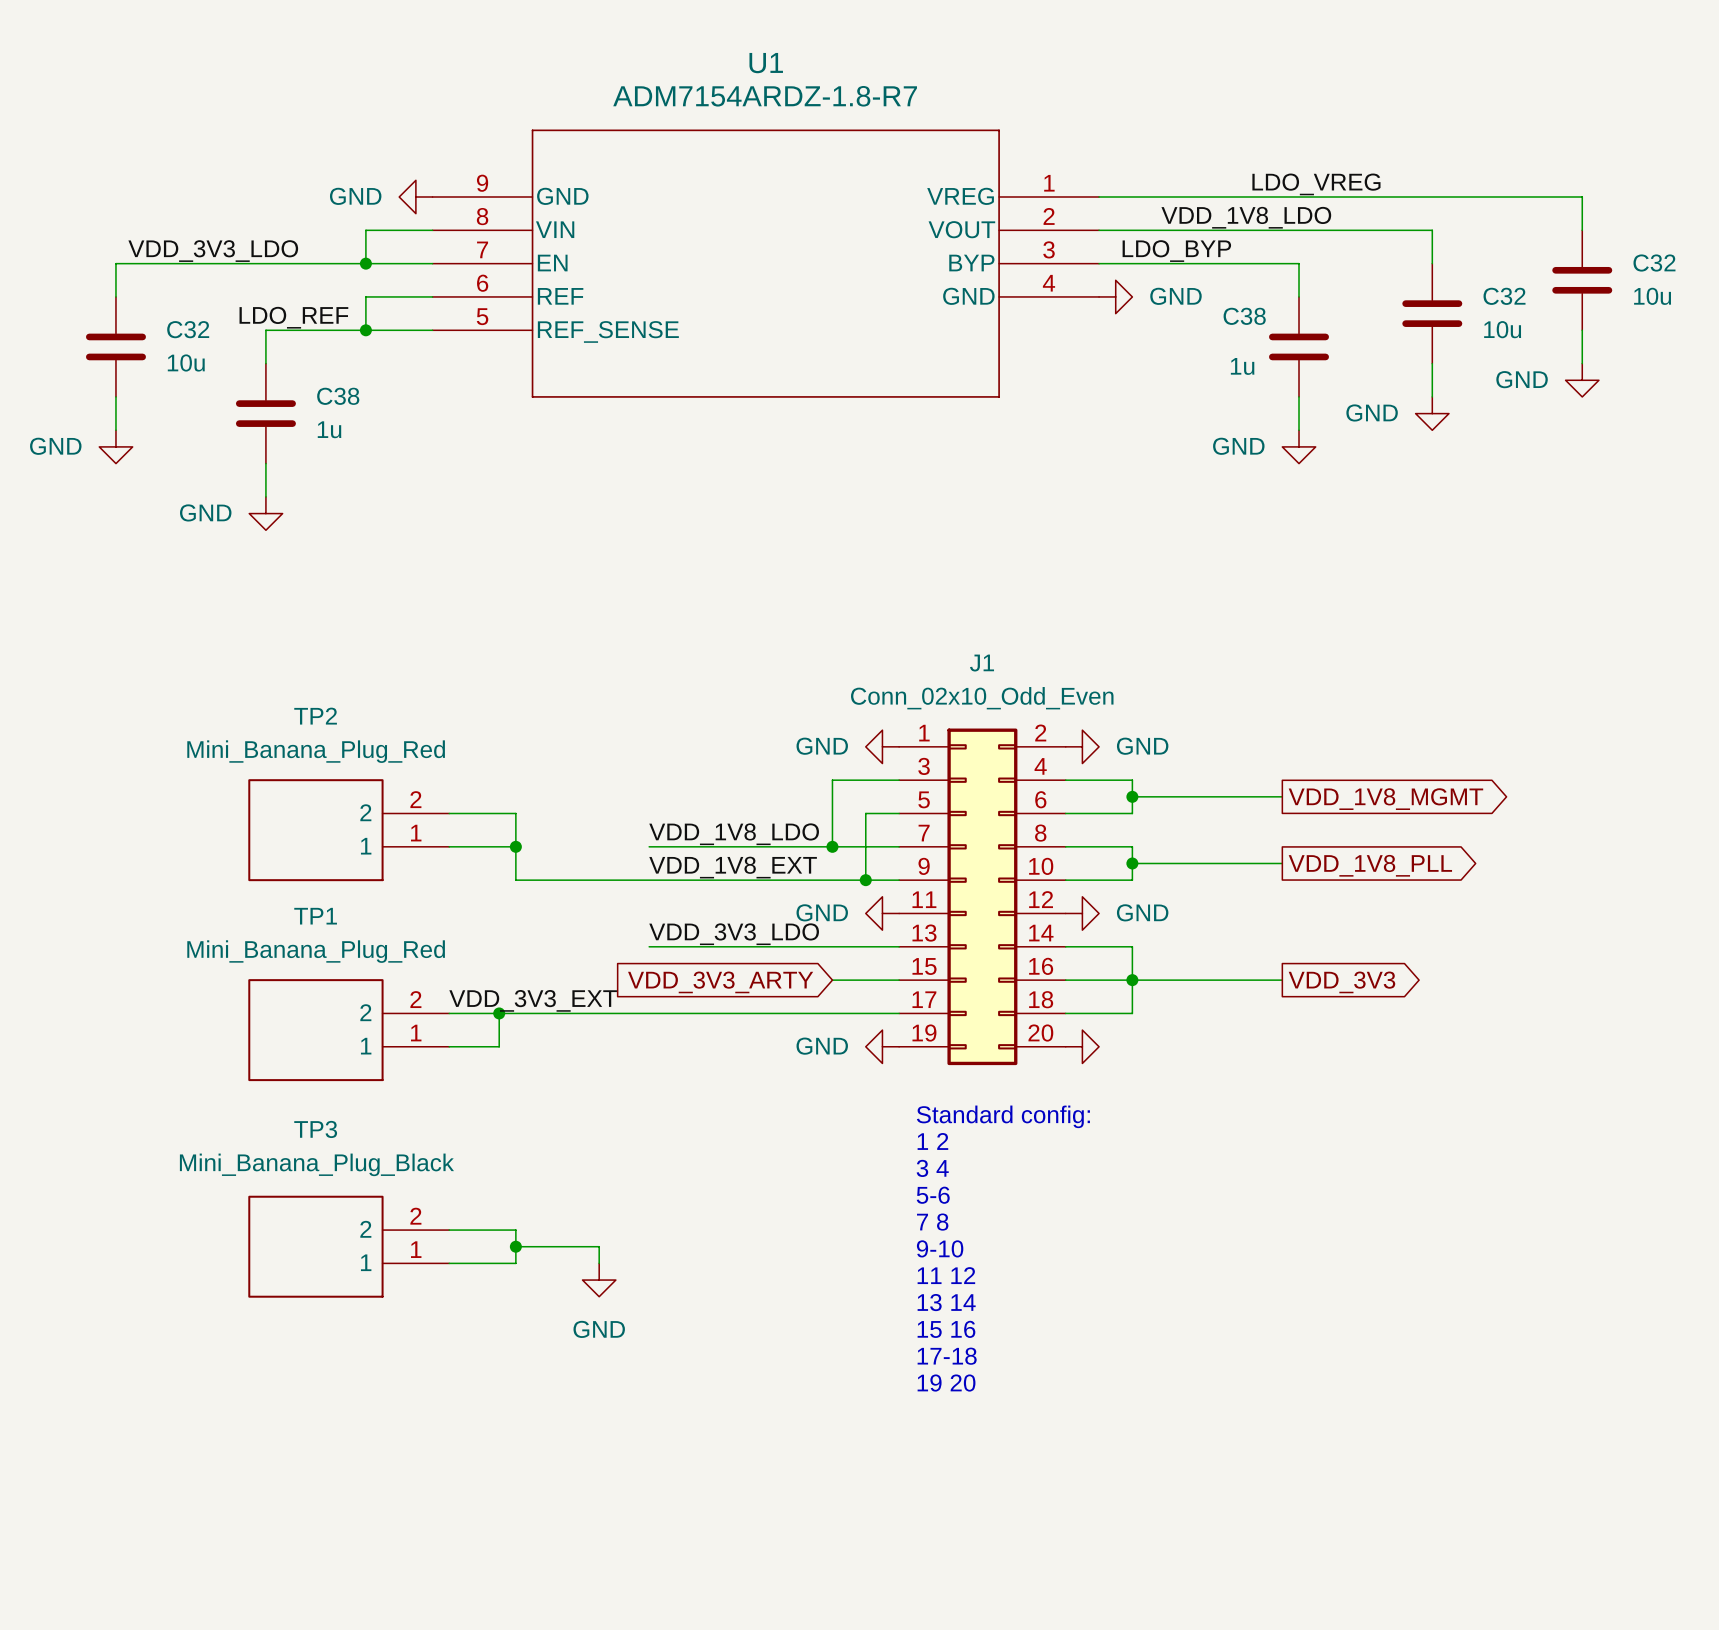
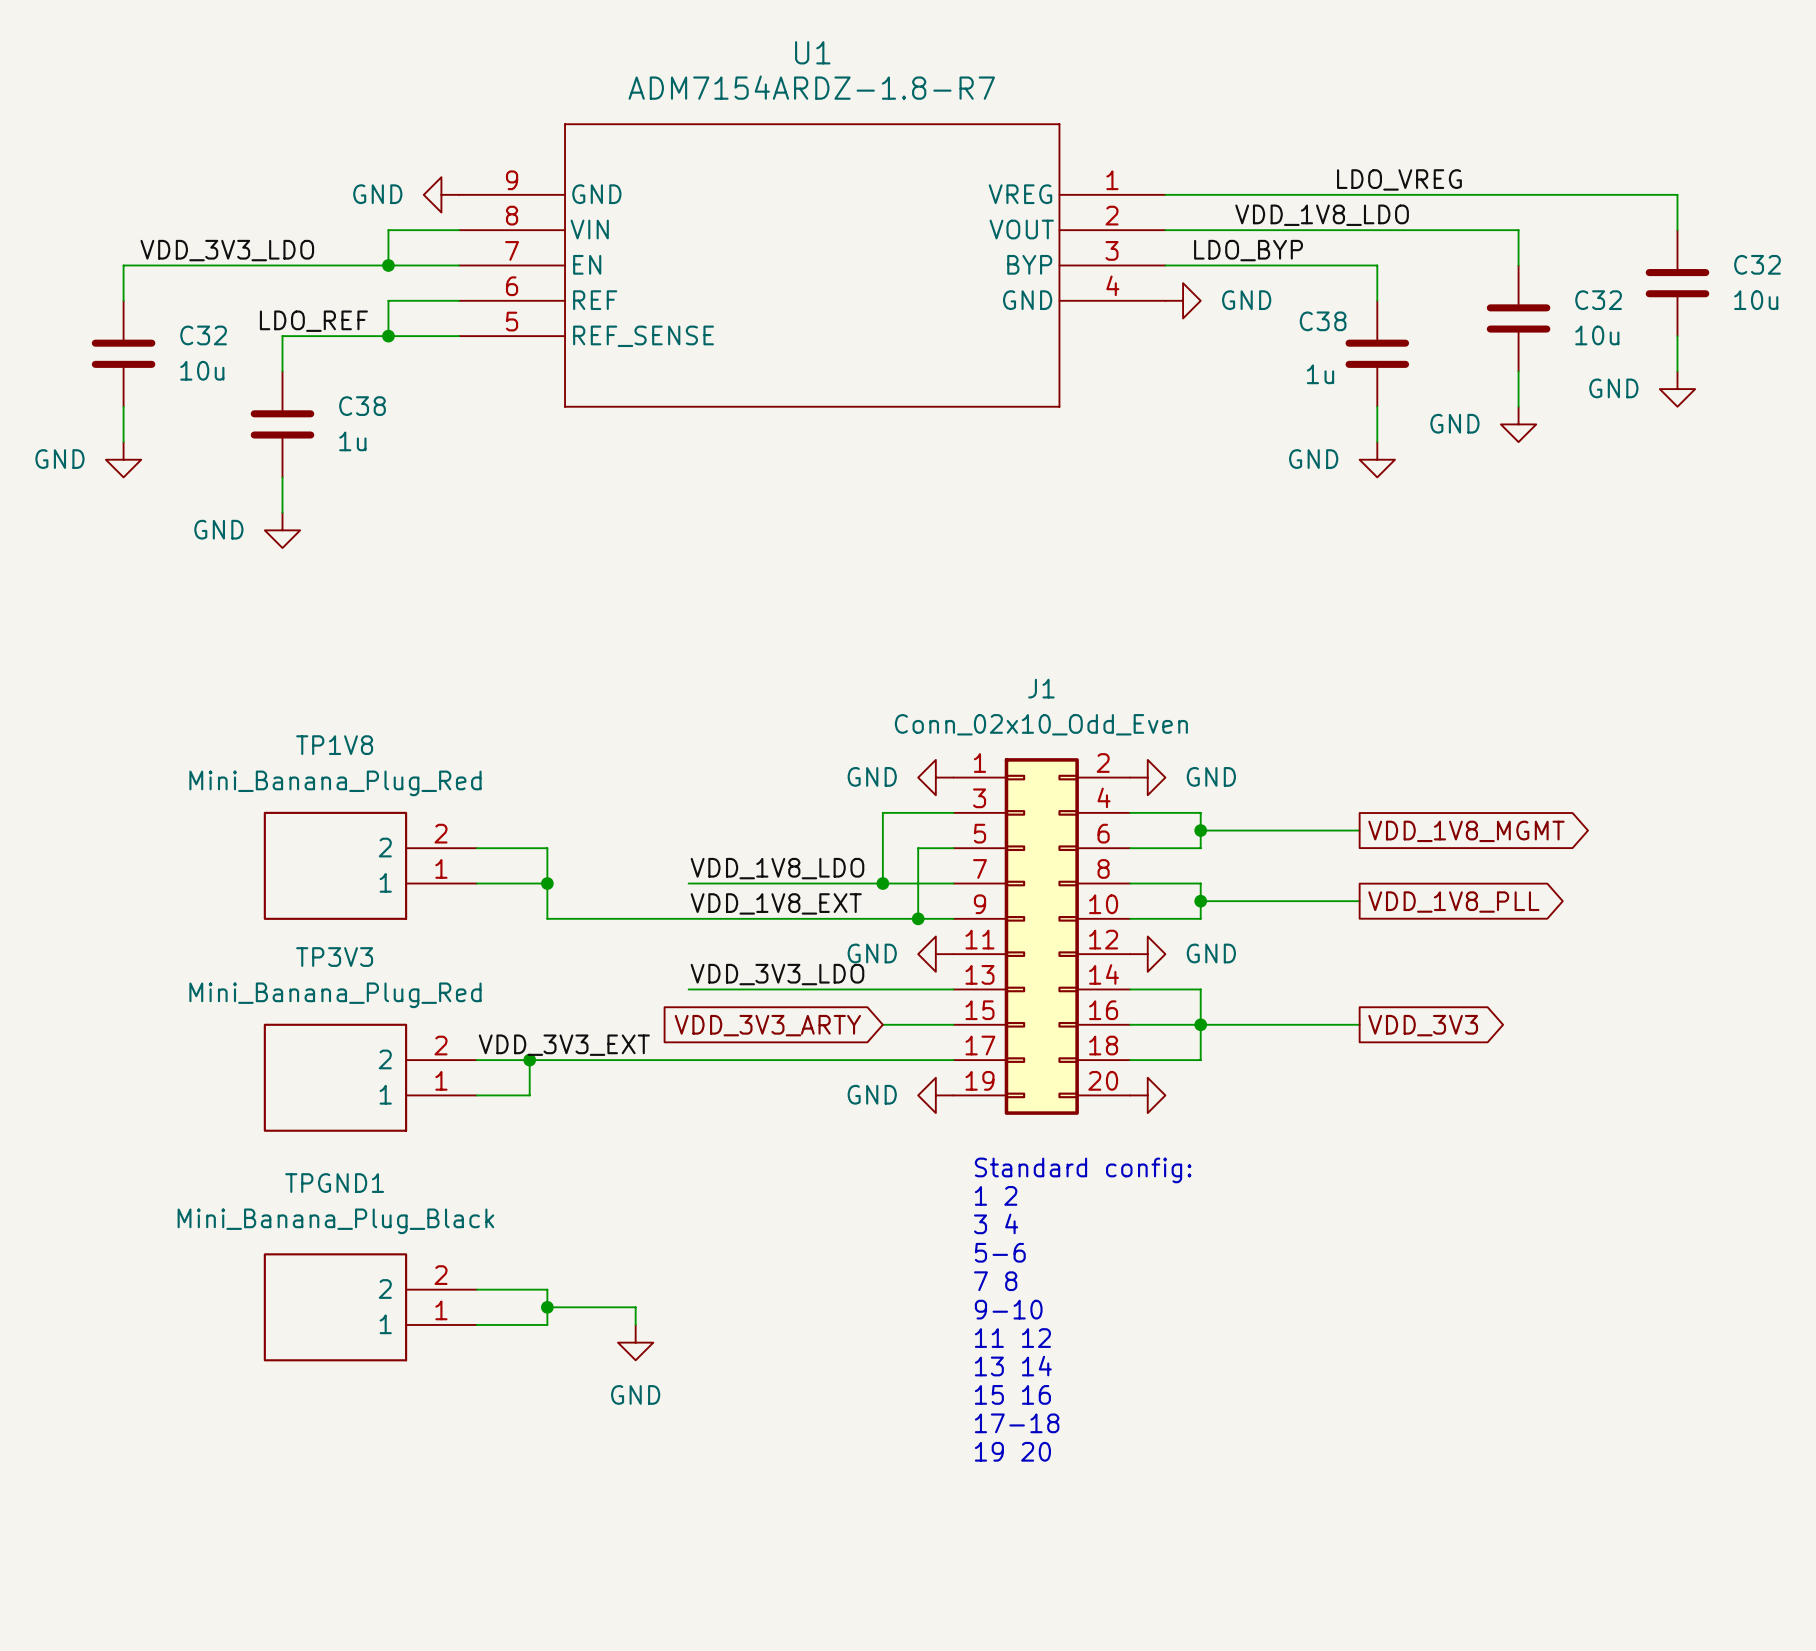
TP2 name: TP2 (315, 716) -> TP1V8 (334, 745)
TP1 name: TP1 (315, 916) -> TP3V3 (334, 957)
TP3 name: TP3 (315, 1129) -> TPGND1 (334, 1183)

